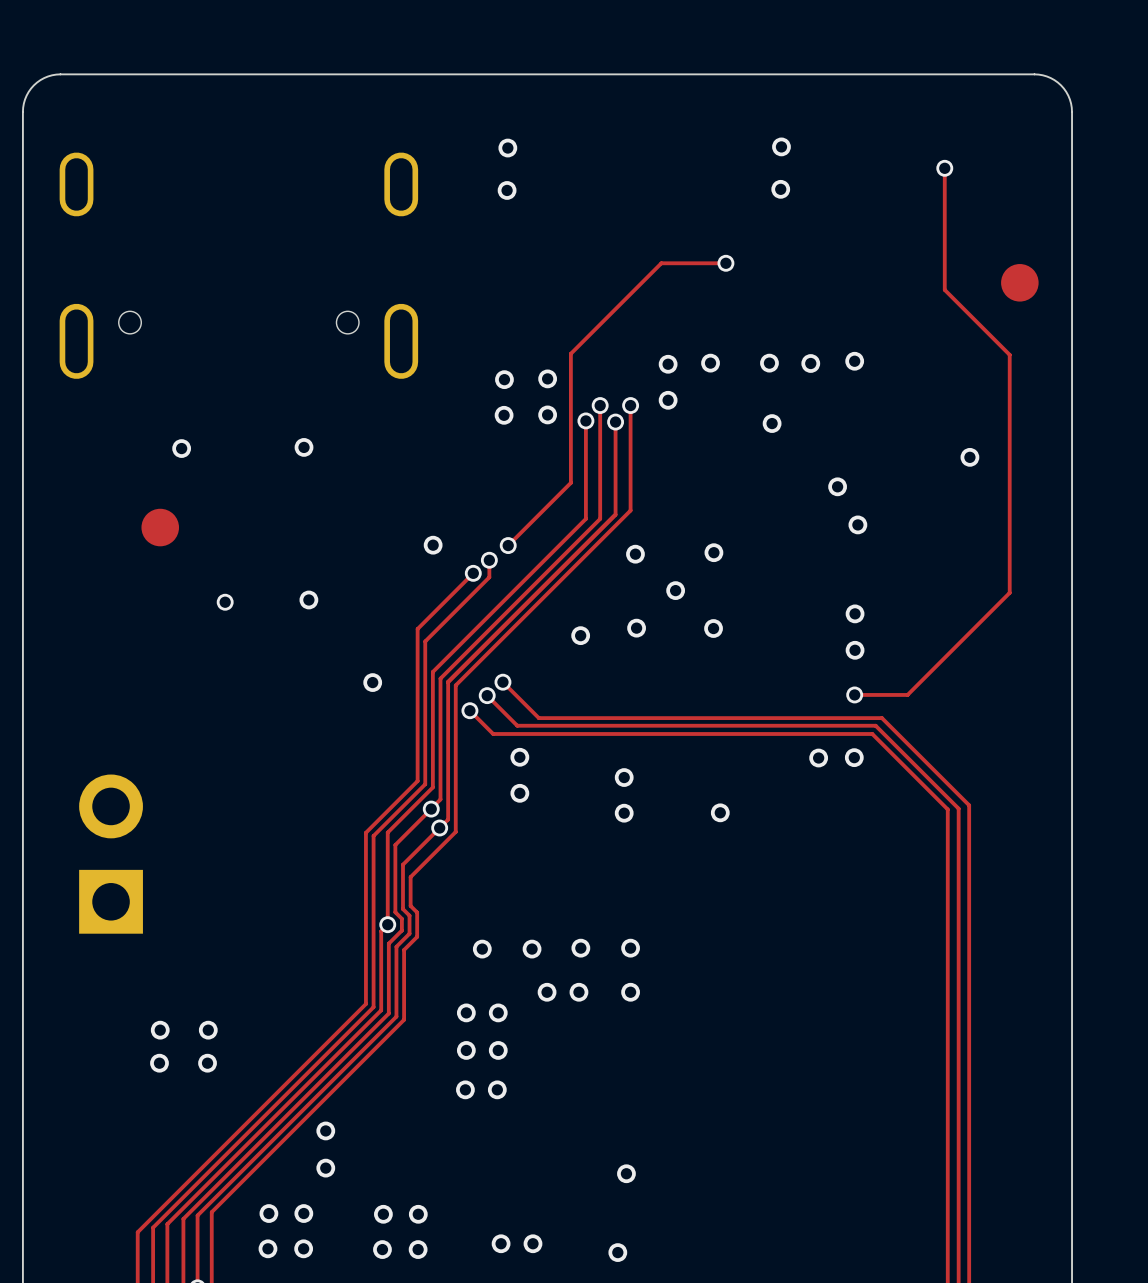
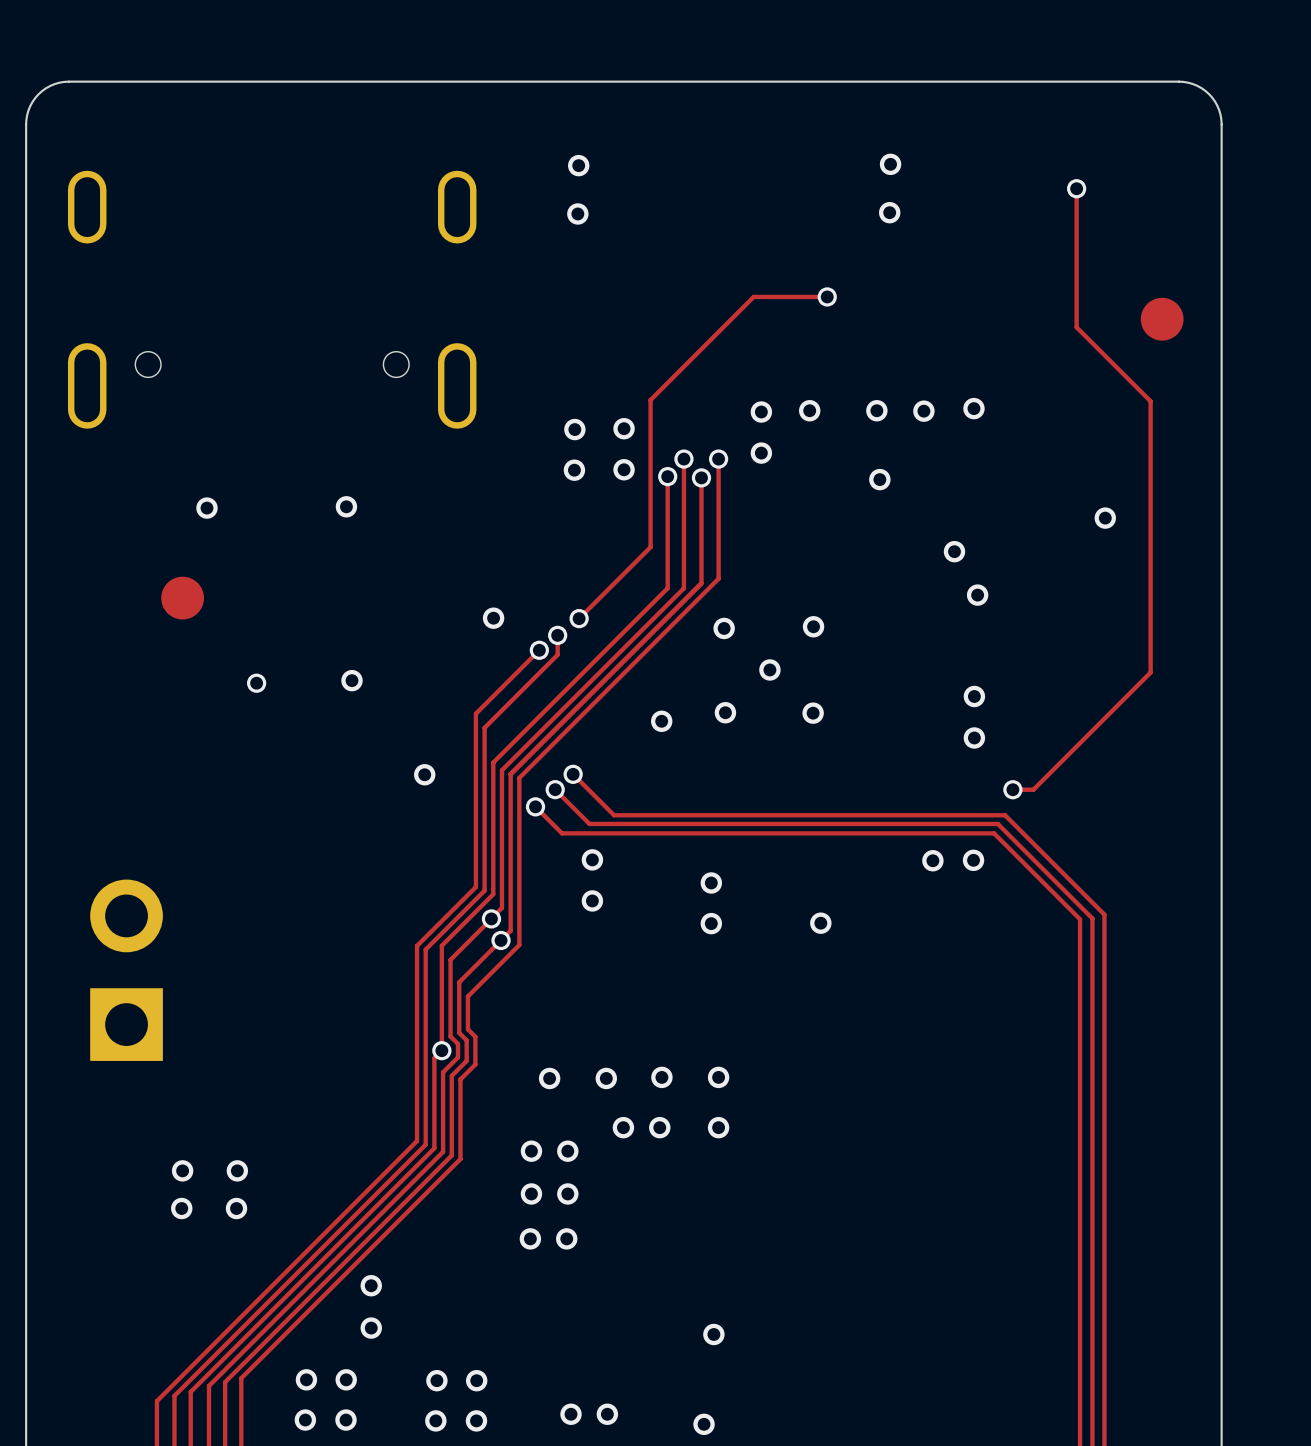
track: (854, 694) (907, 694) -> (1012, 789) (1034, 788)
via position: (854, 694) -> (1012, 789)

